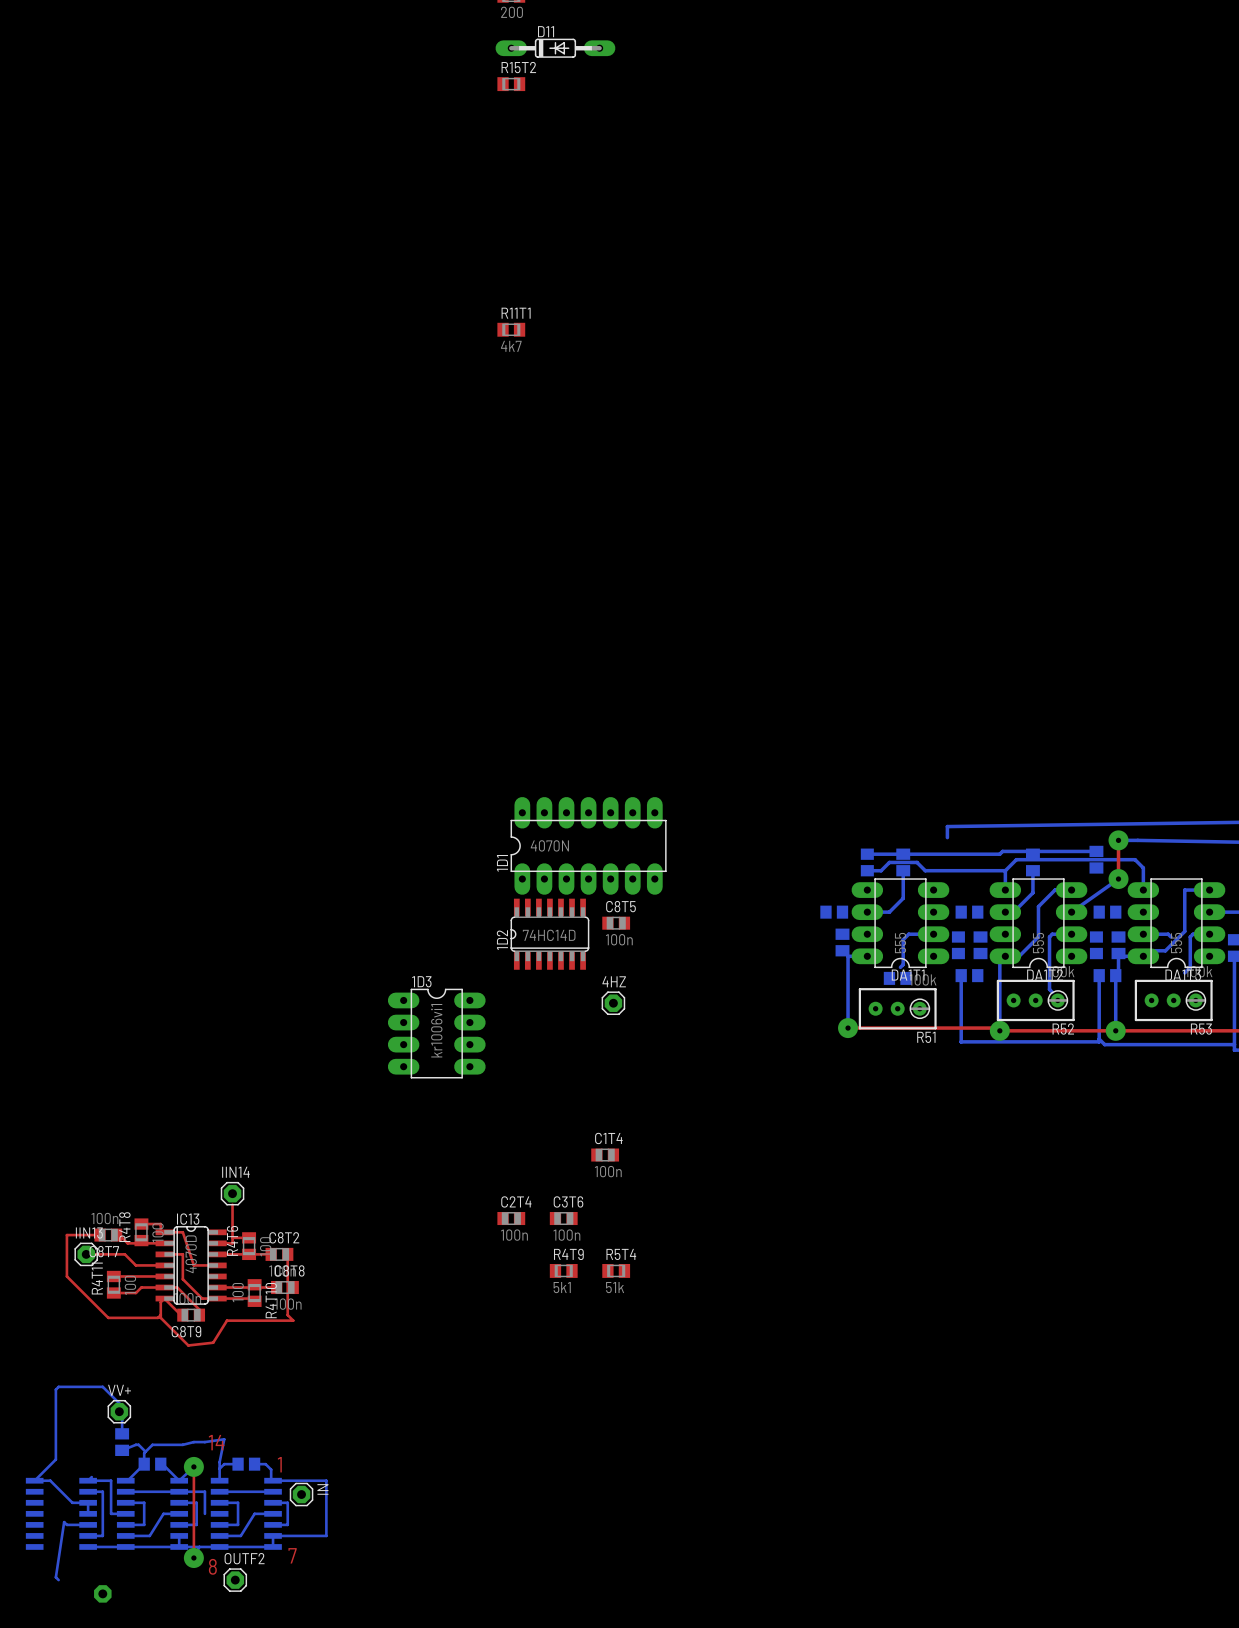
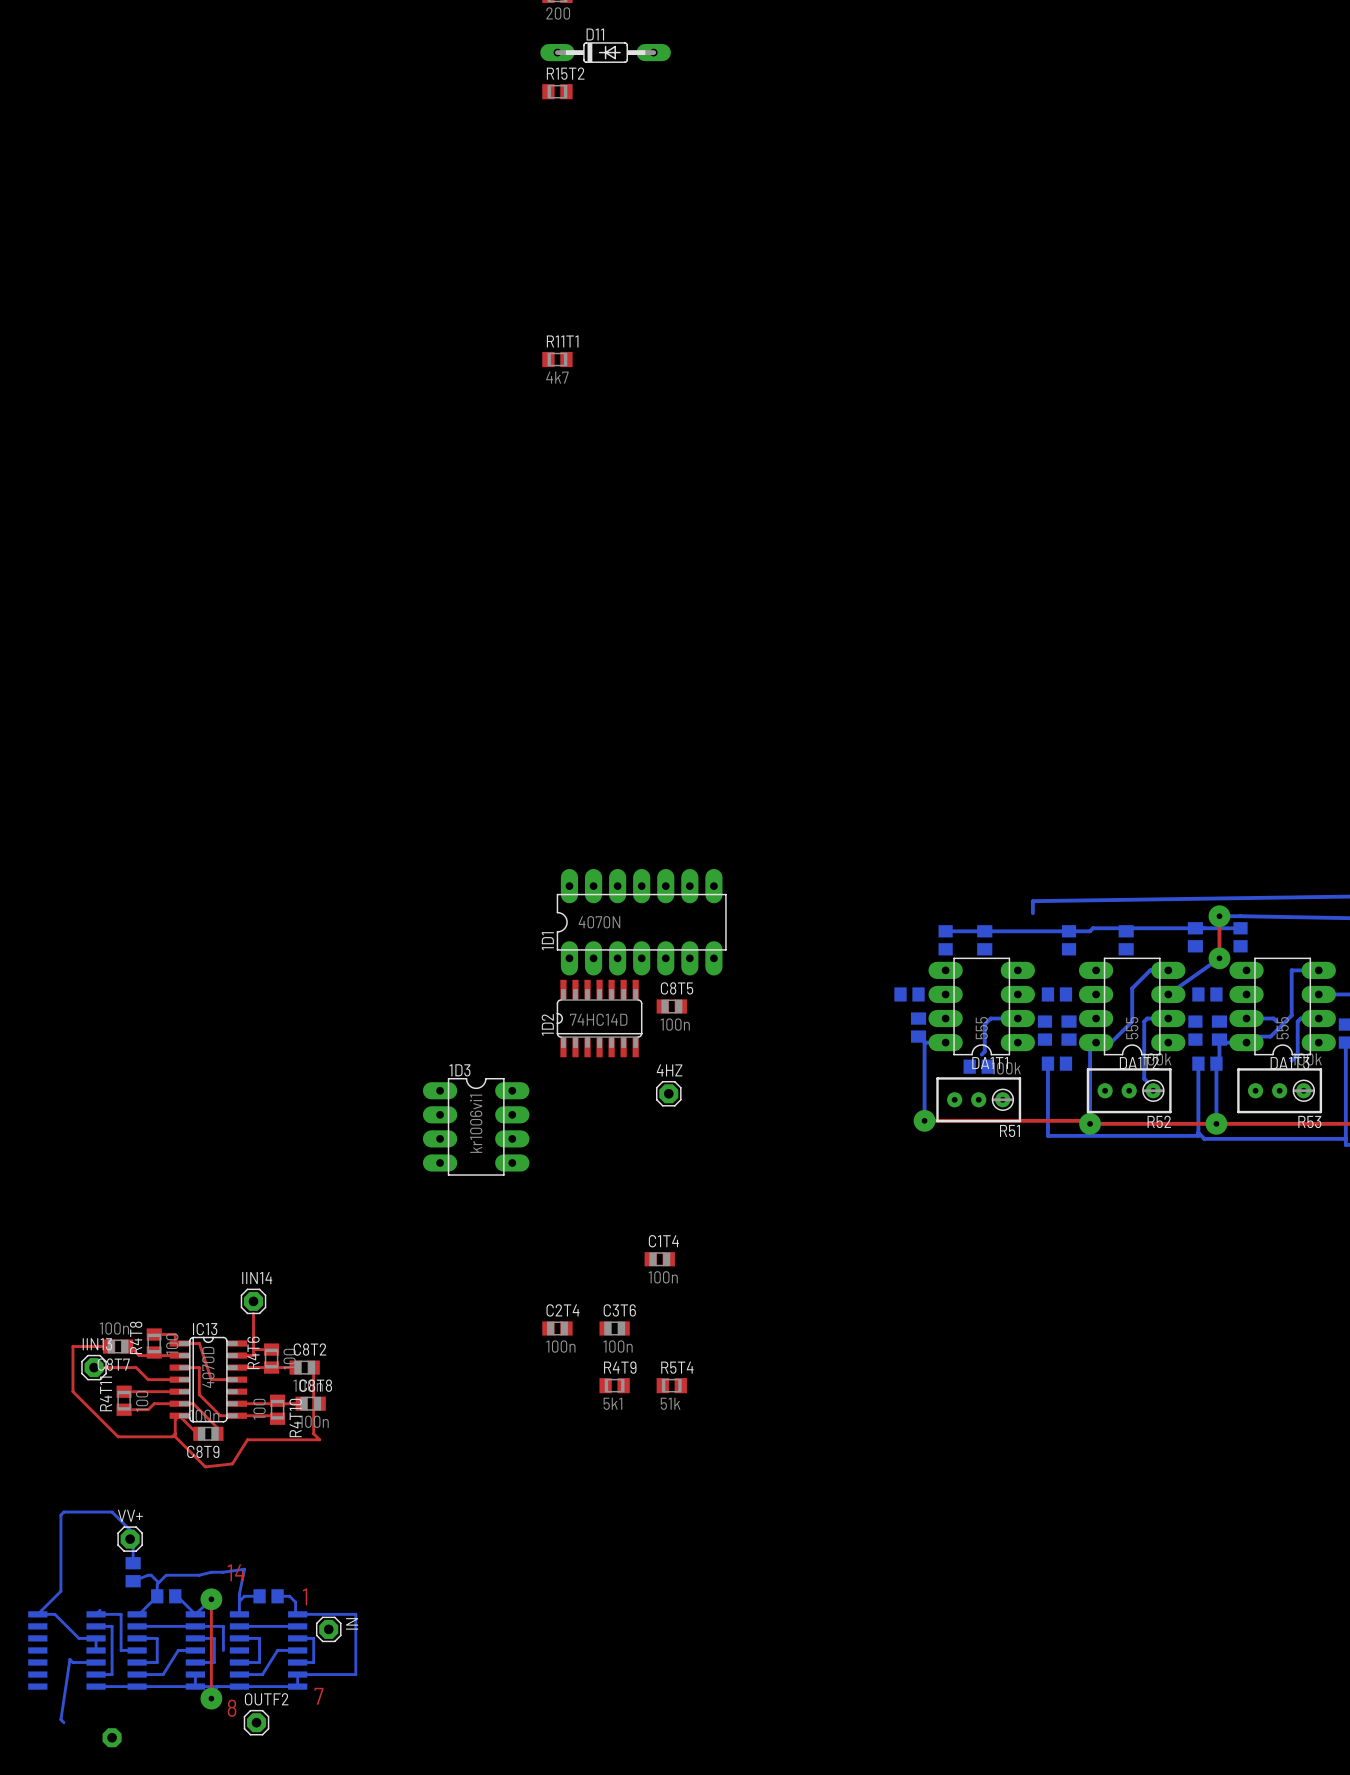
bottom track: none -> (1195, 928) (1240, 928)
part: none -> (1240, 937)
part: none -> (1069, 940)
bottom track: (903, 870) (903, 898) (889, 912) (867, 912) -> none
bottom track: (1005, 870) (925, 870) (917, 862) (889, 862) (881, 870) (867, 870) -> none
bottom track: (1032, 870) (1032, 892) (1013, 912) (1005, 912) -> none
bottom track: (999, 890) (1005, 890) (1005, 870) (1016, 859) (1135, 859) (1143, 867) (1143, 890) -> none

